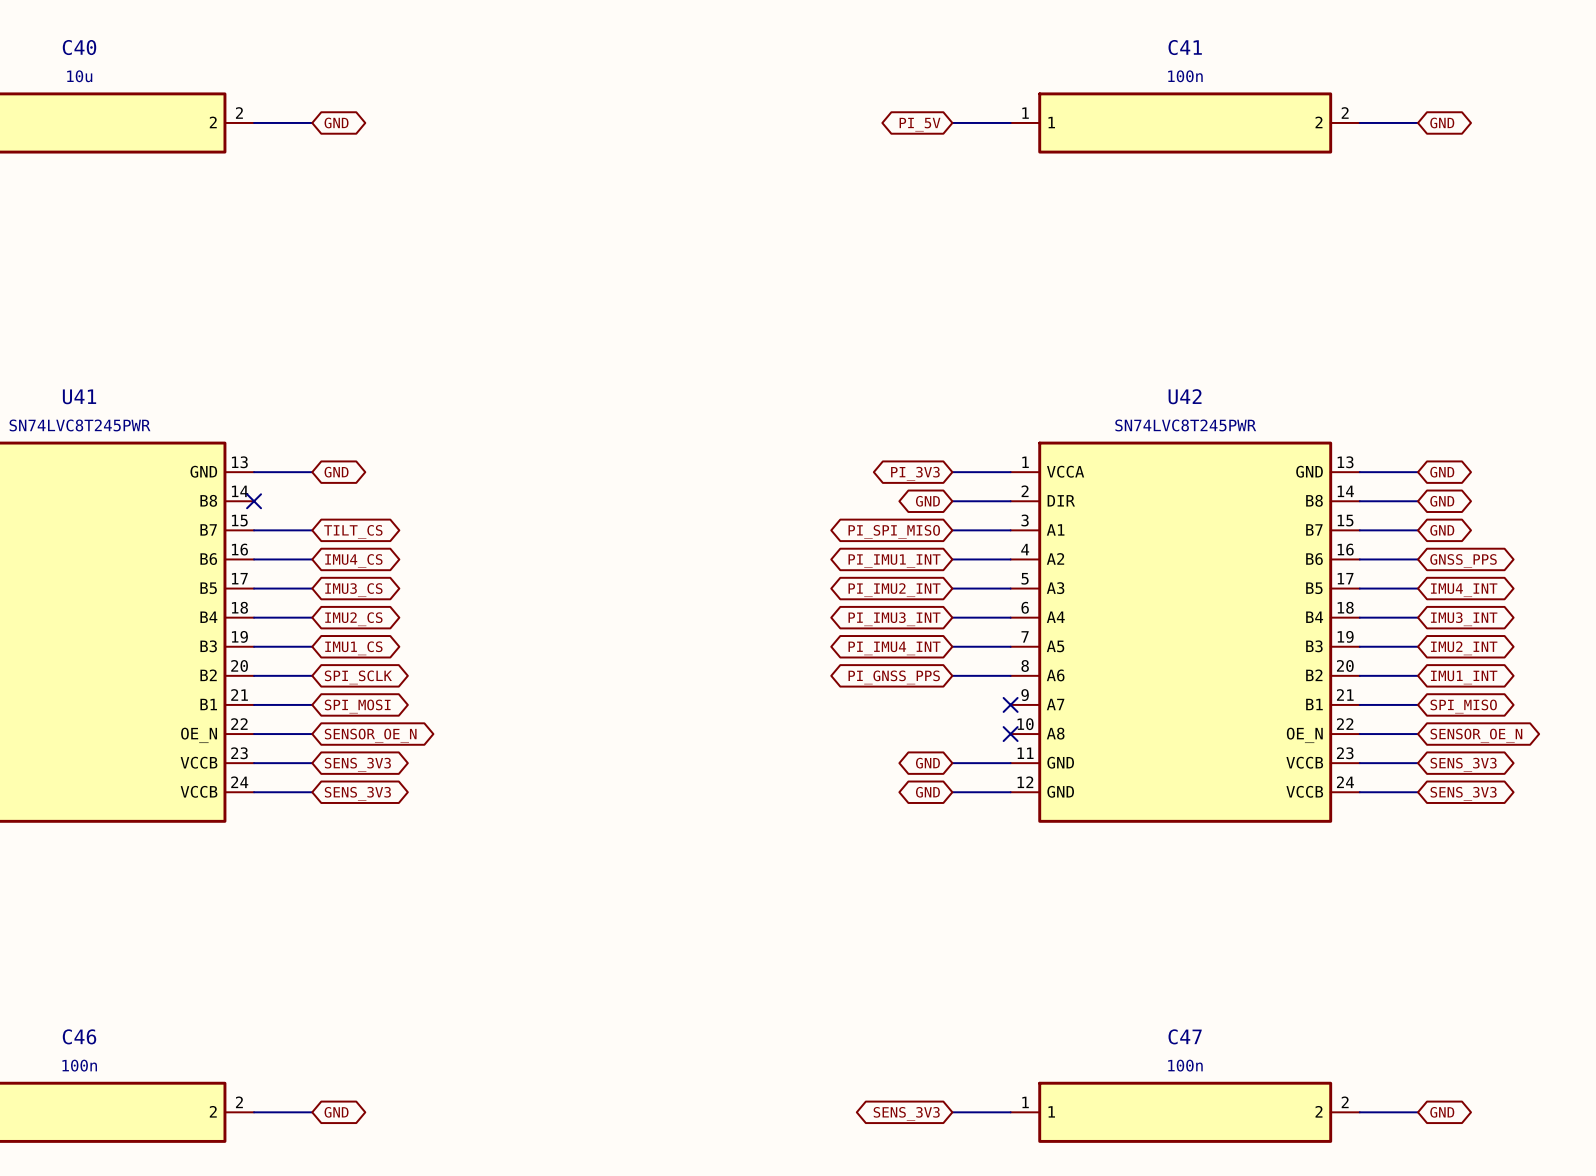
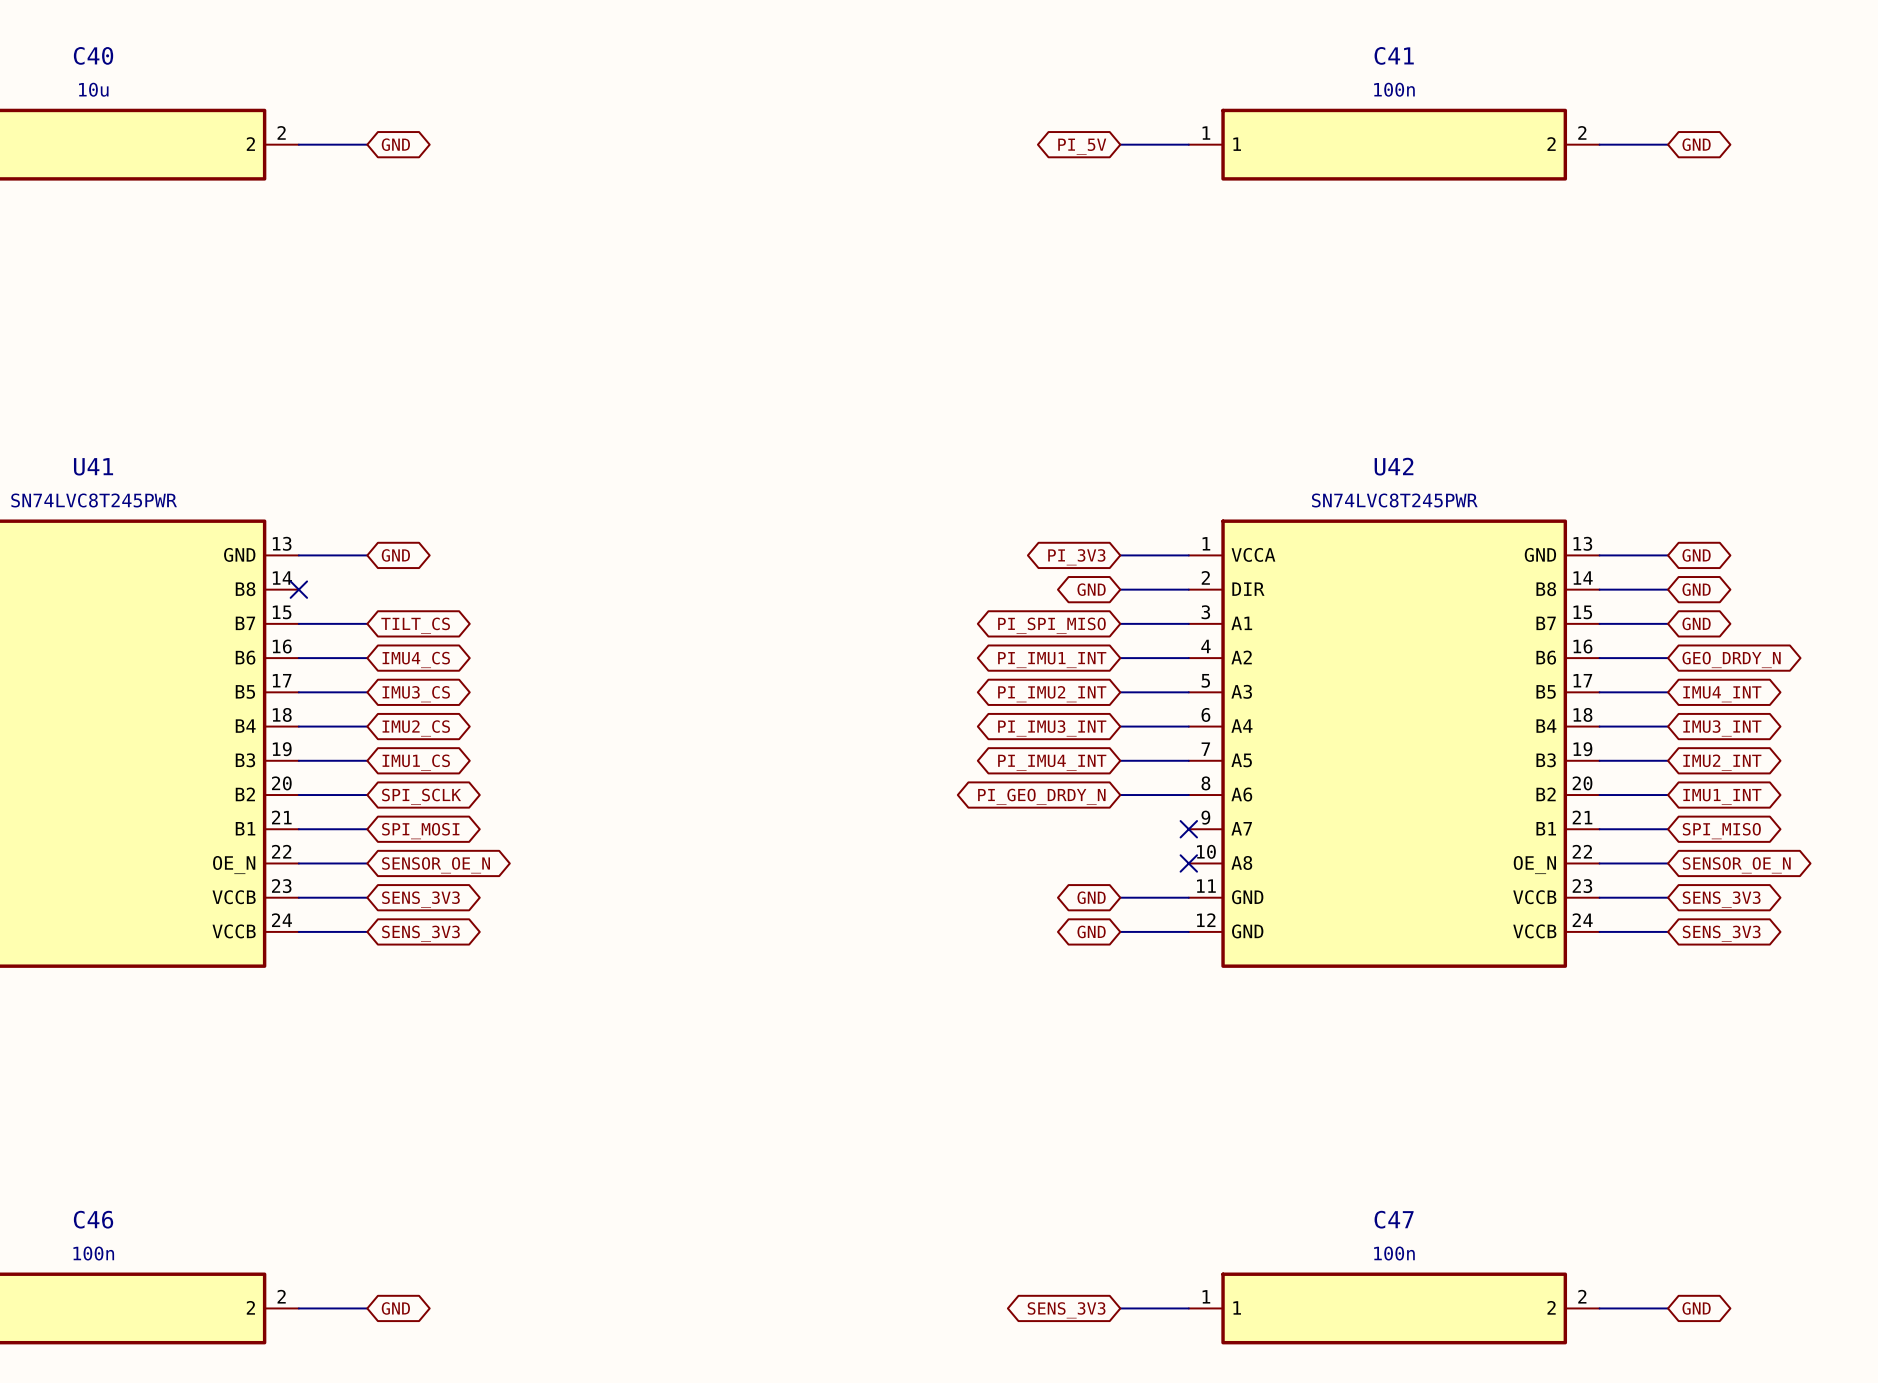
global label: GNSS_PPS (1463, 561) -> GEO_DRDY_N (1731, 659)
global label: PI_GNSS_PPS (894, 677) -> PI_GEO_DRDY_N (1041, 796)

